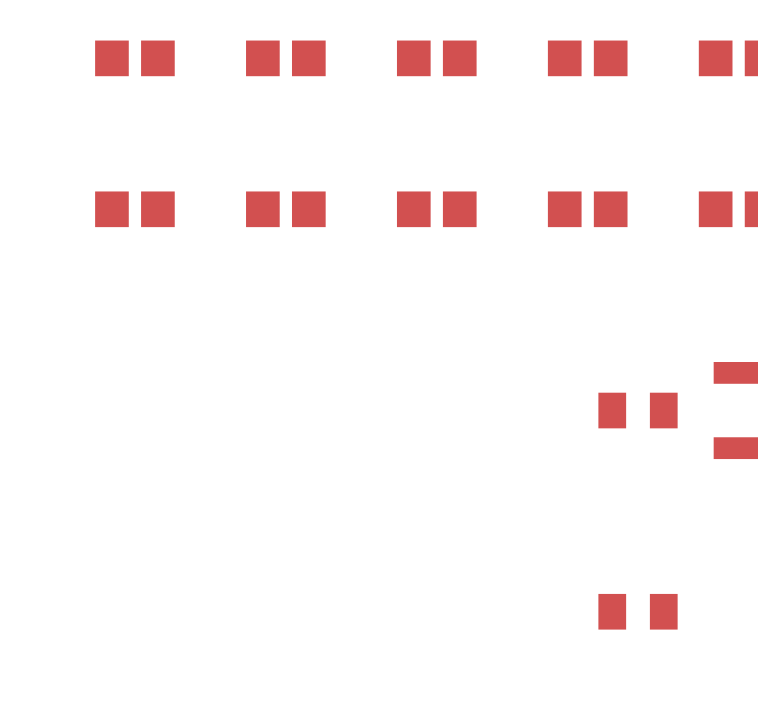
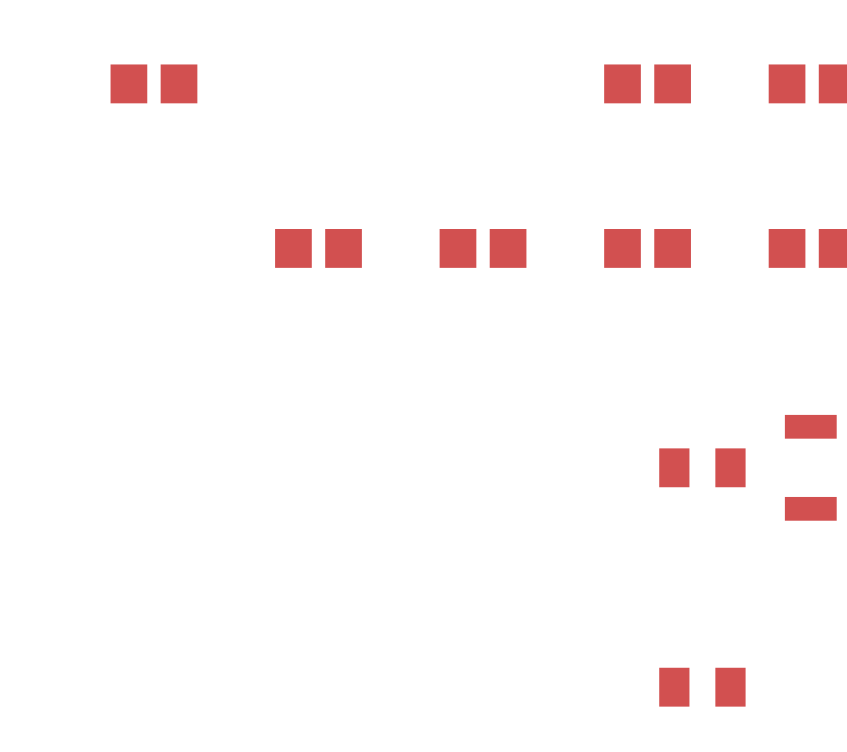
part: (285, 58) -> none
part: (436, 58) -> none
part: (134, 209) -> none

